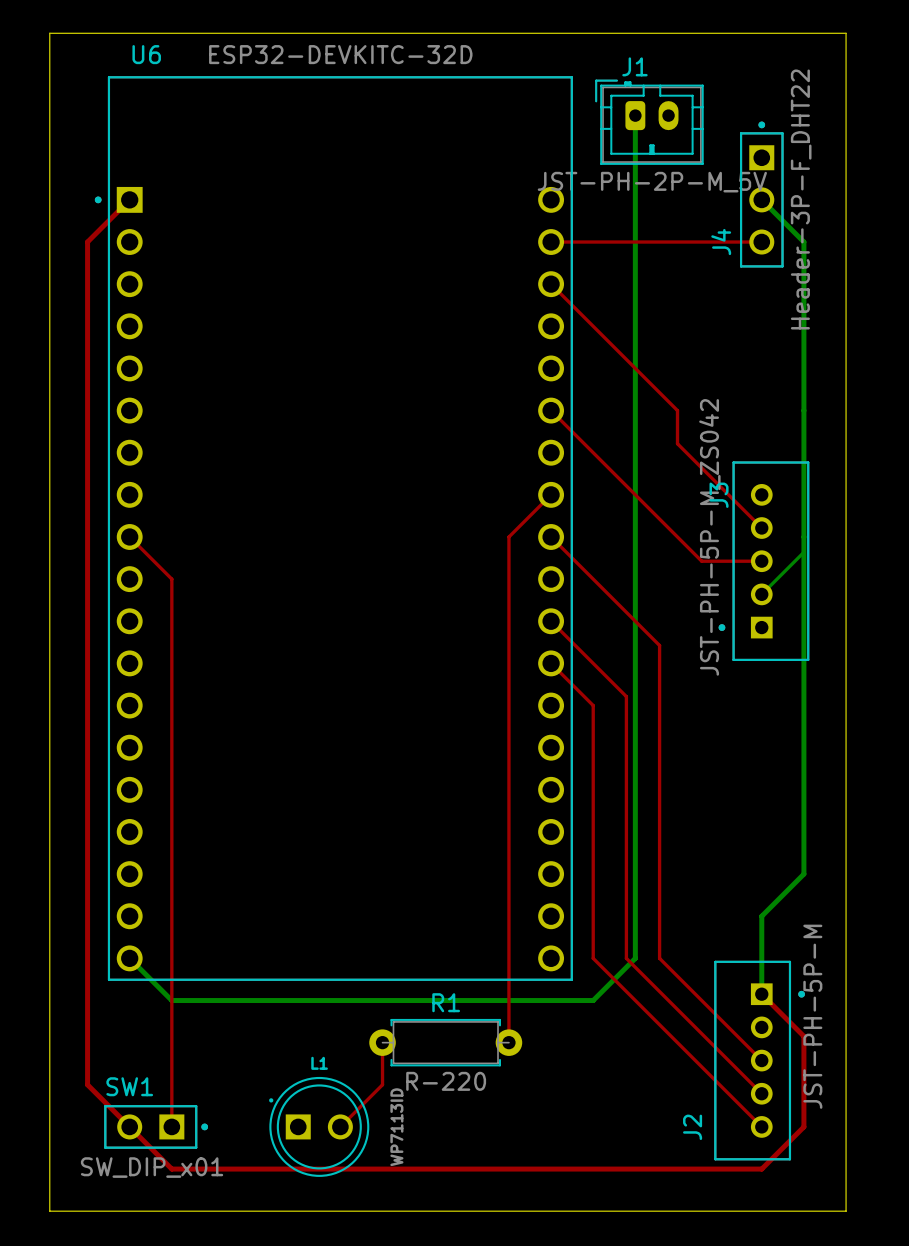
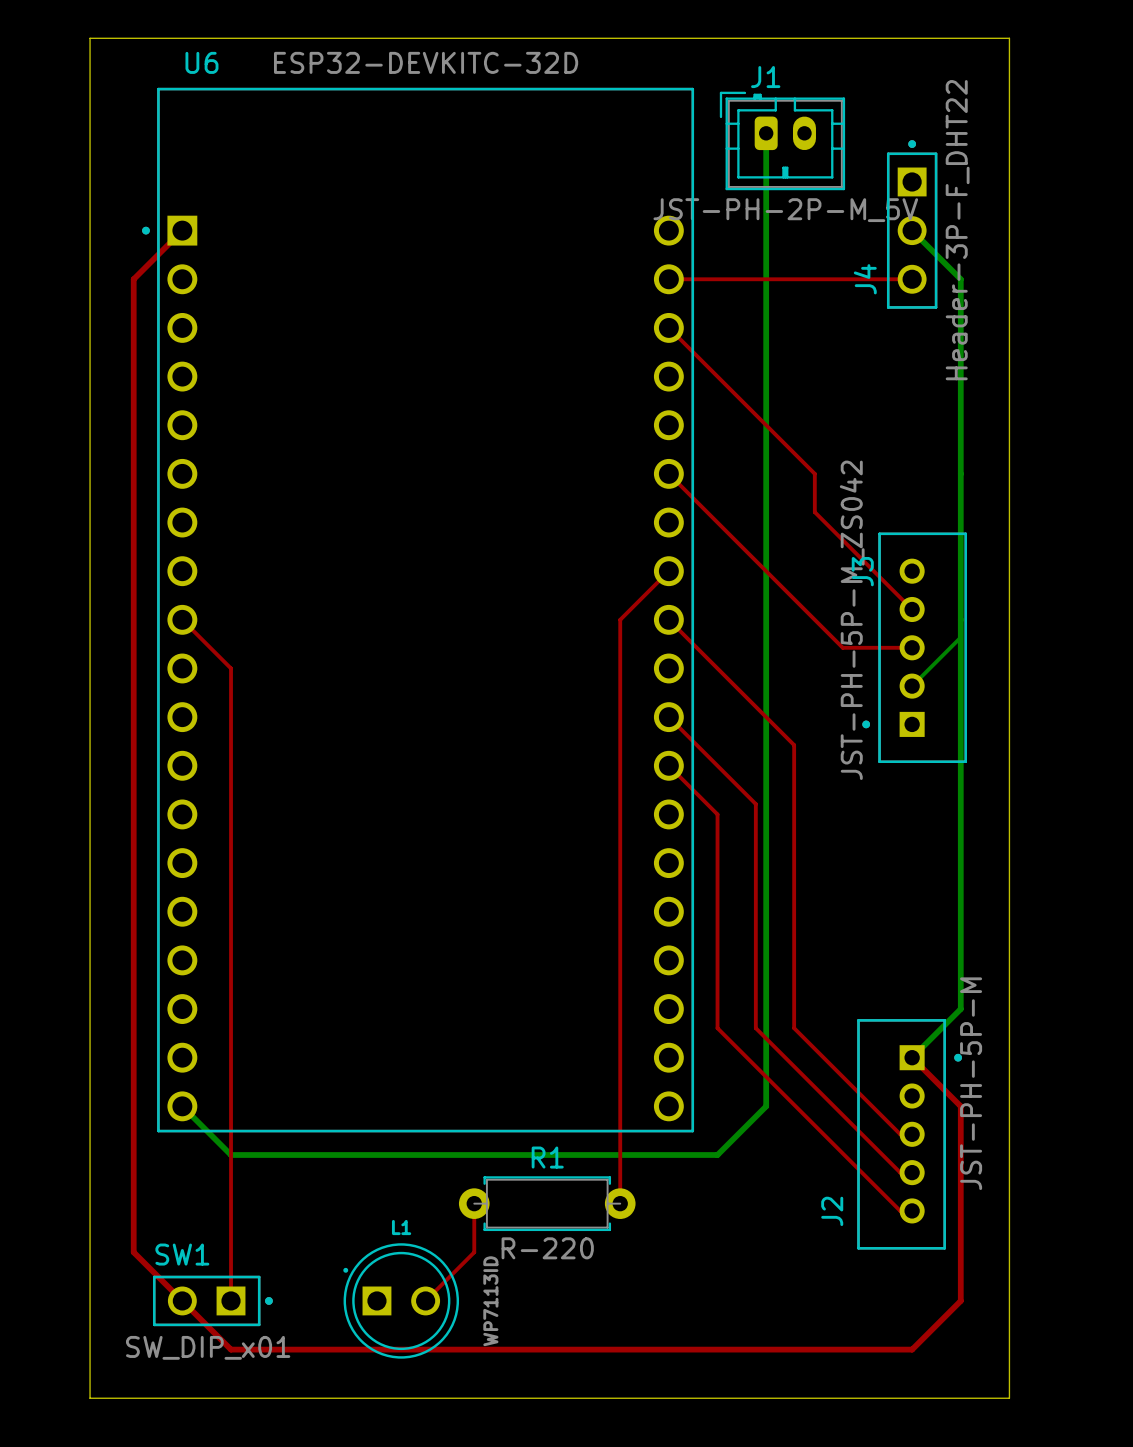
top track: (593, 890) (593, 958) (761, 1126) -> (717, 1028) (900, 1210) (912, 1210)
top track: (626, 890) (626, 958) (761, 1093) -> (755, 1028) (900, 1172) (912, 1172)
top track: (659, 890) (659, 958) (761, 1060) -> (794, 1028) (900, 1134) (912, 1134)
bottom track: (761, 916) (761, 994) -> none
top track: (761, 994) (803, 1036) -> (912, 1057) (960, 1106) (960, 1196)
J2 position: (759, 1060) -> (909, 1134)

